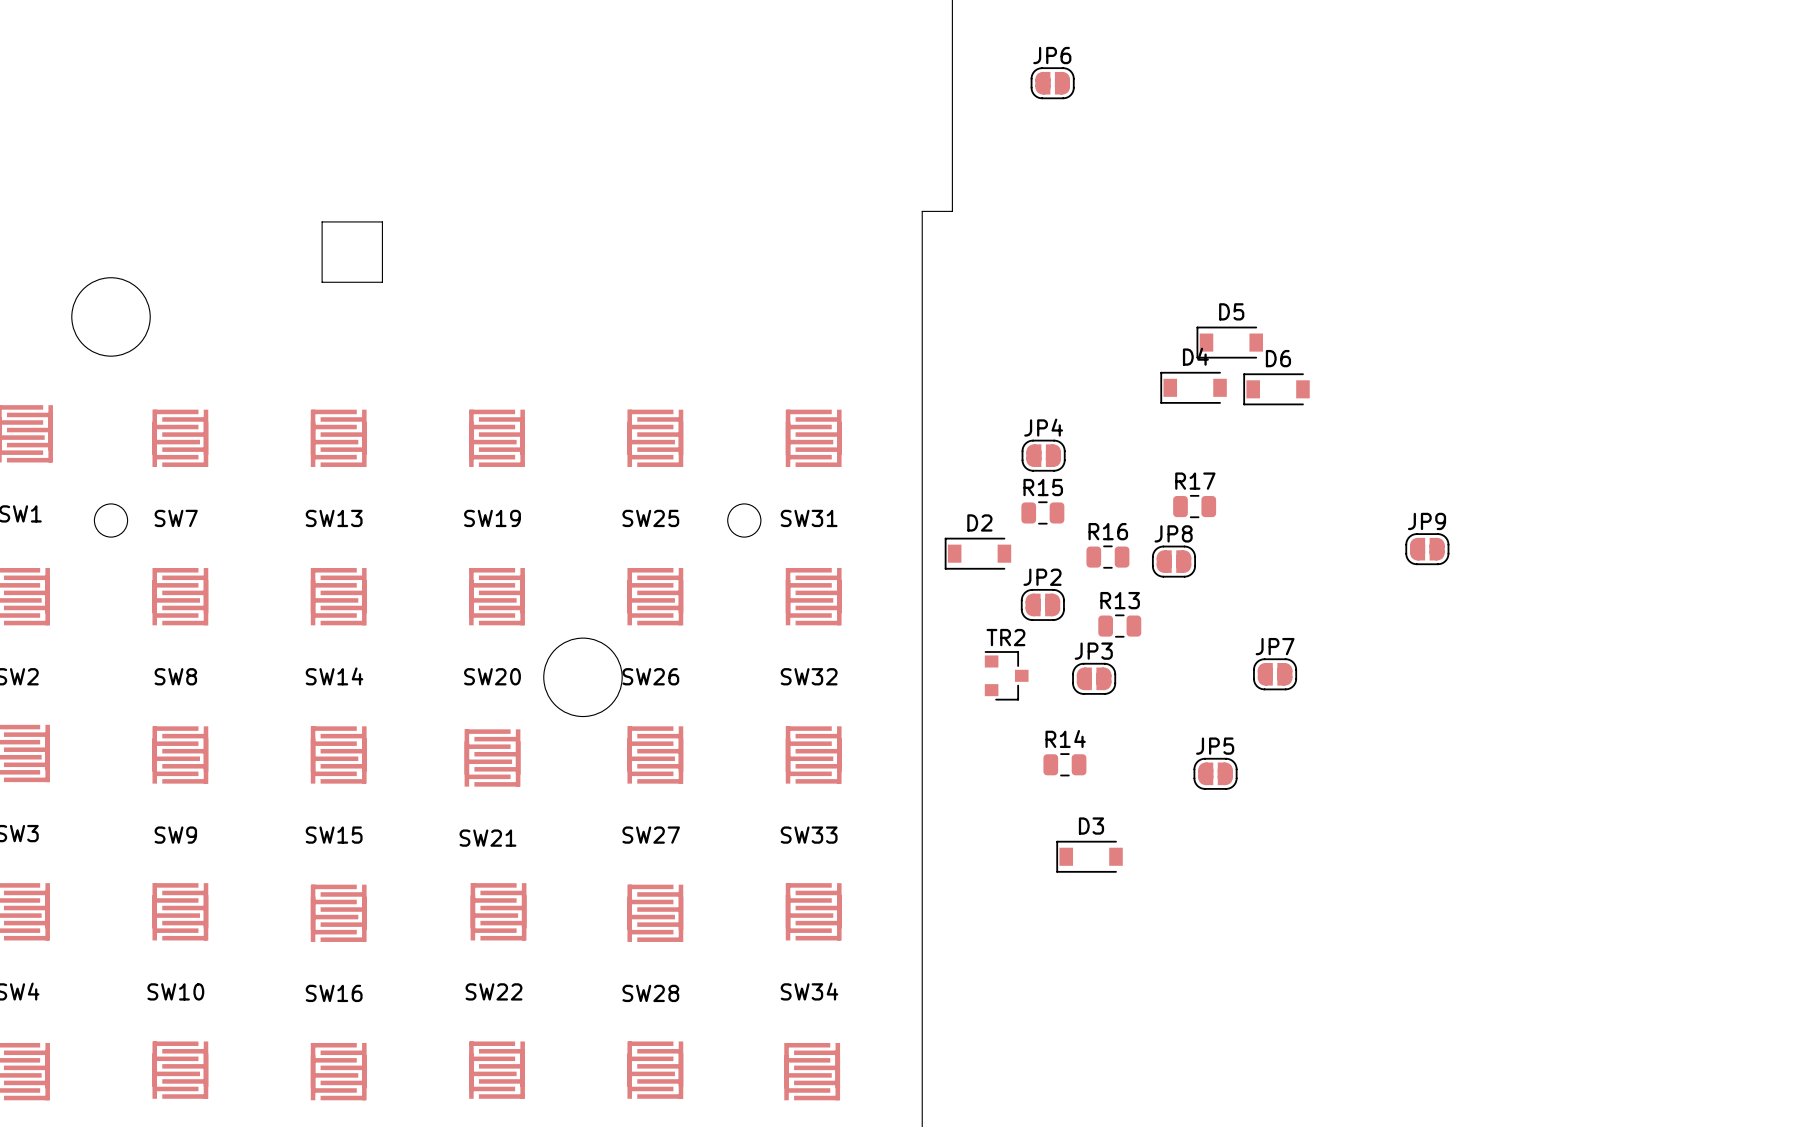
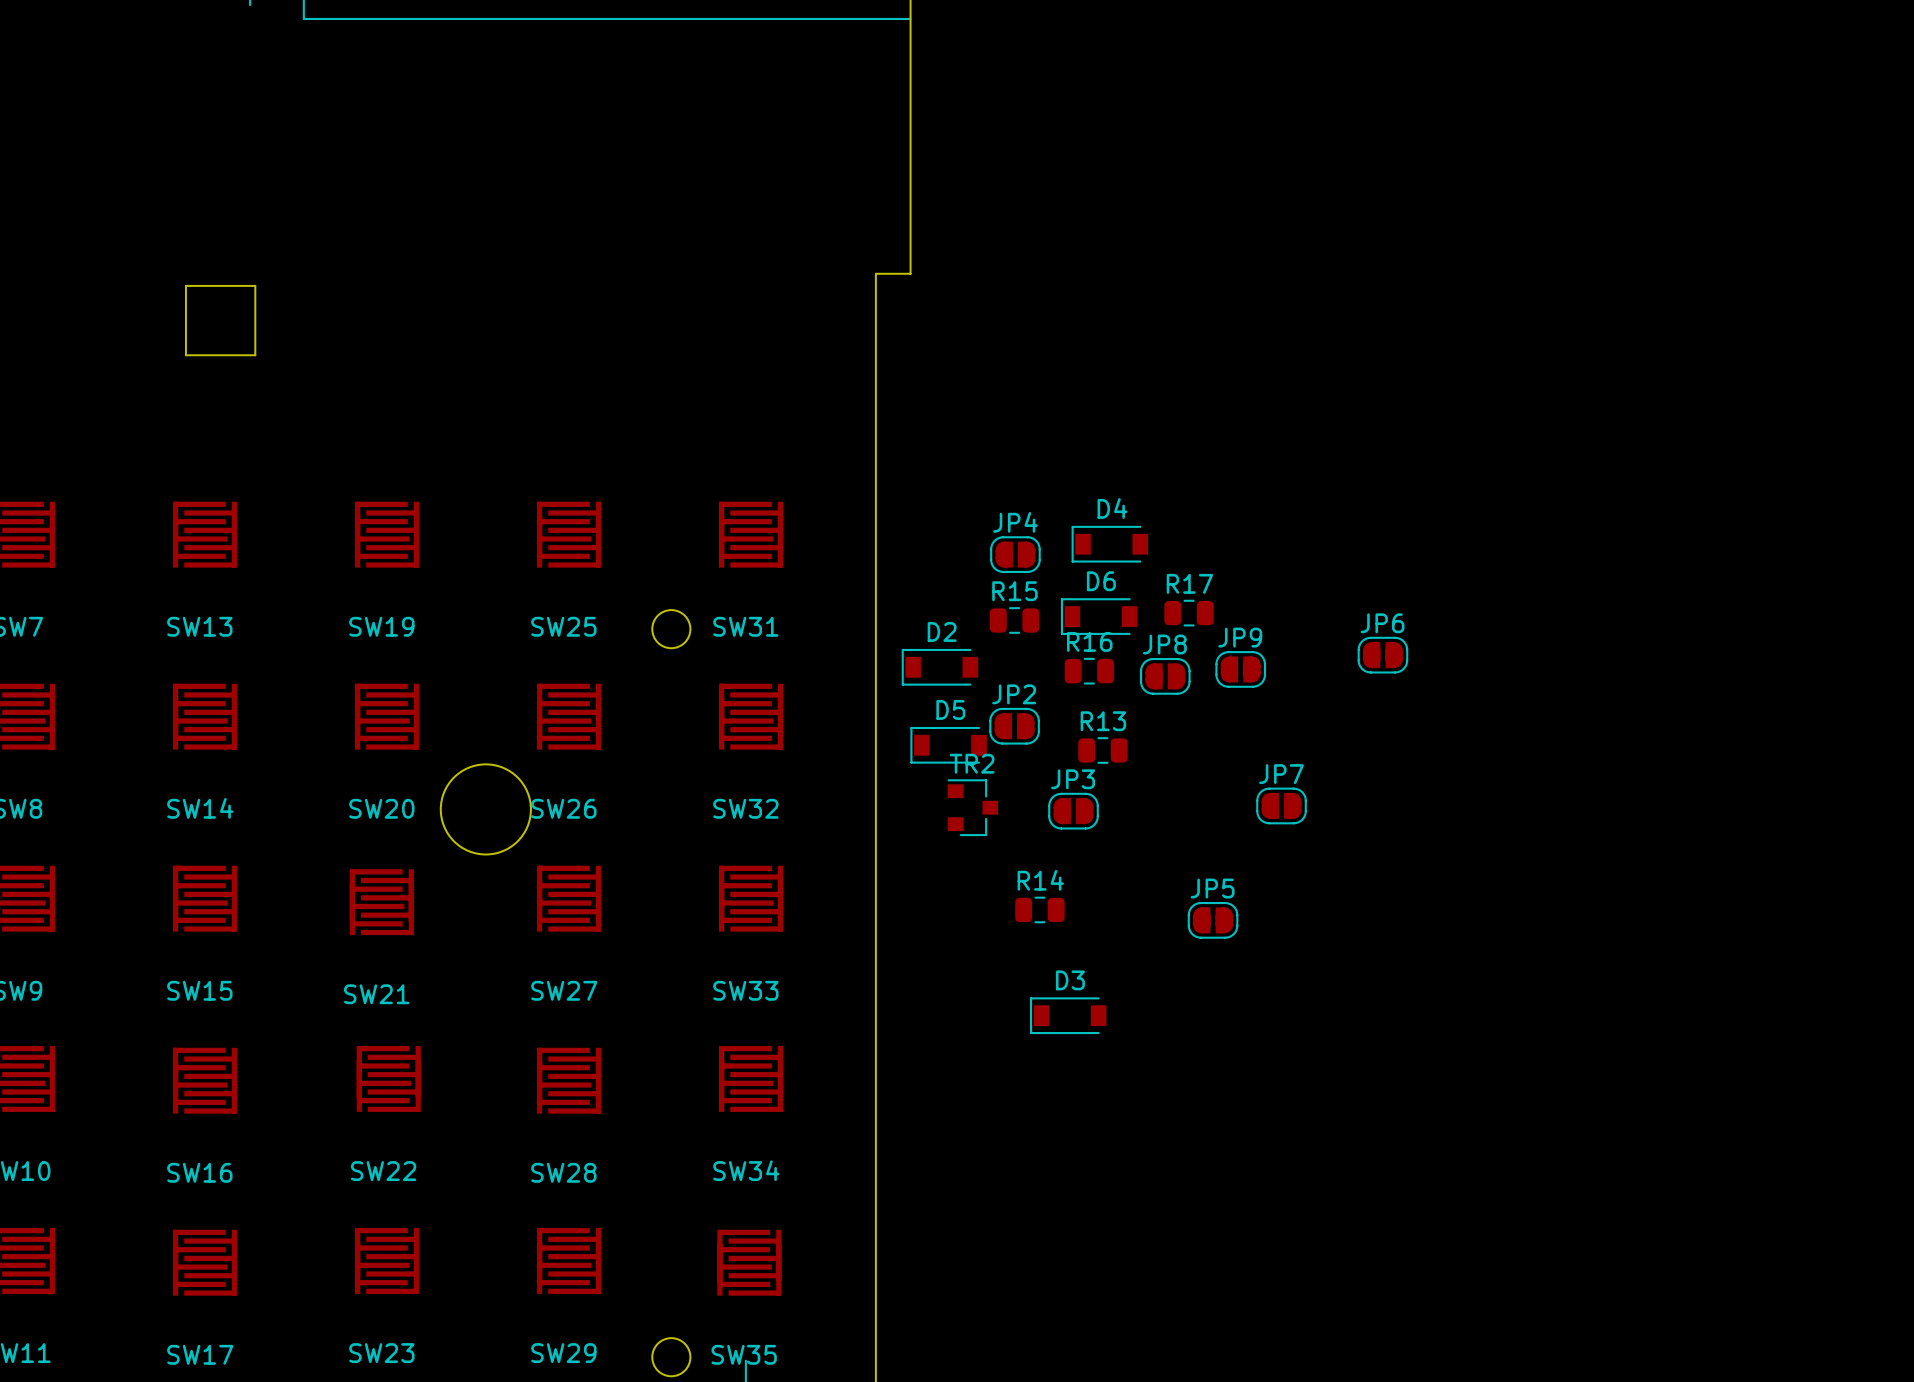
JP6 position: (1052, 83) -> (1382, 655)
D5 position: (1229, 342) -> (948, 745)
D4 position: (1193, 387) -> (1109, 544)
D6 position: (1276, 389) -> (1099, 616)
JP9 position: (1427, 549) -> (1240, 669)

